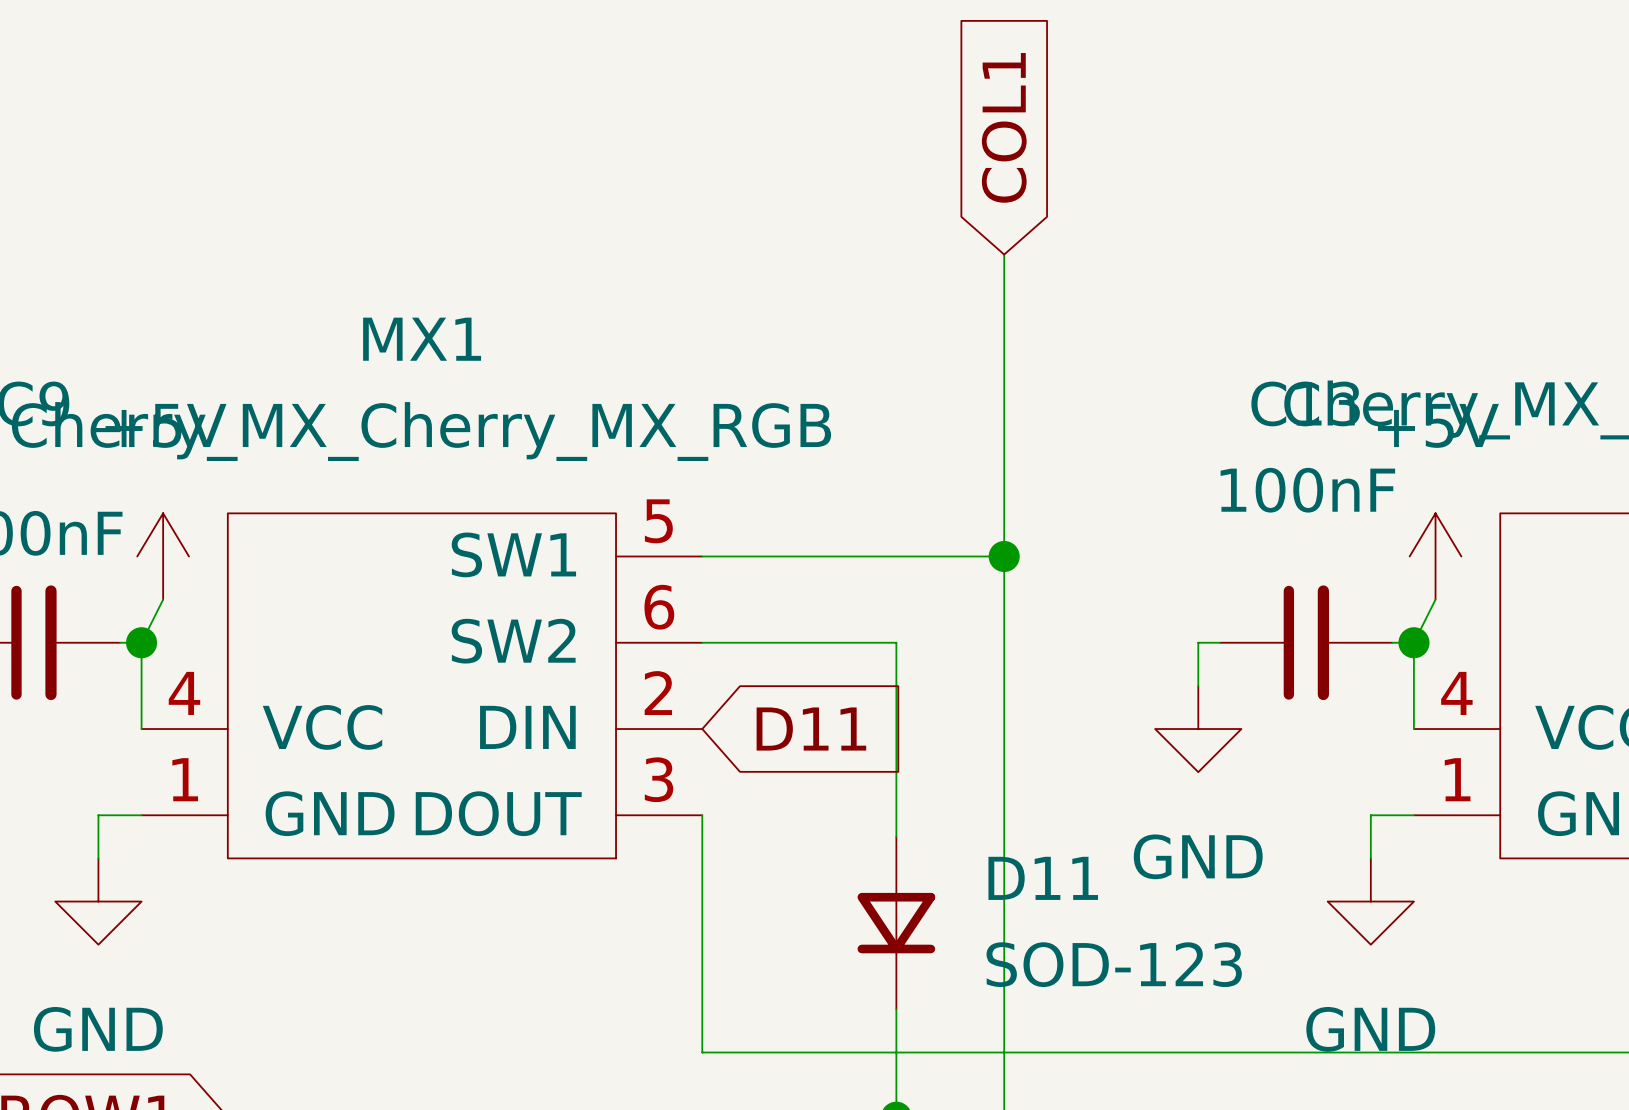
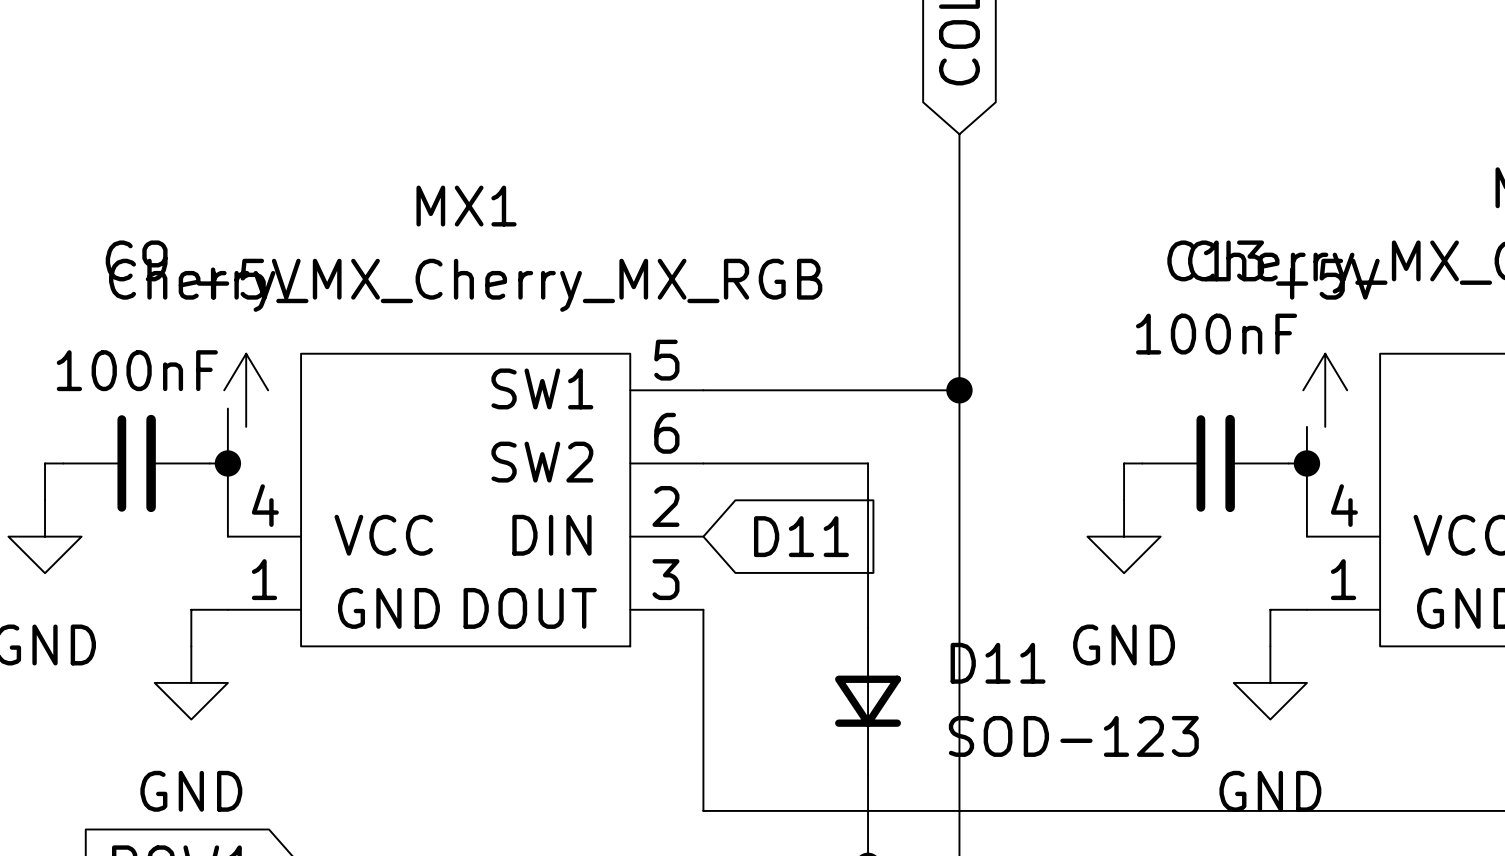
wire: (163, 599) (141, 642) -> (227, 408) (227, 463)
wire: (1435, 599) (1413, 642) -> (1306, 426) (1306, 463)

